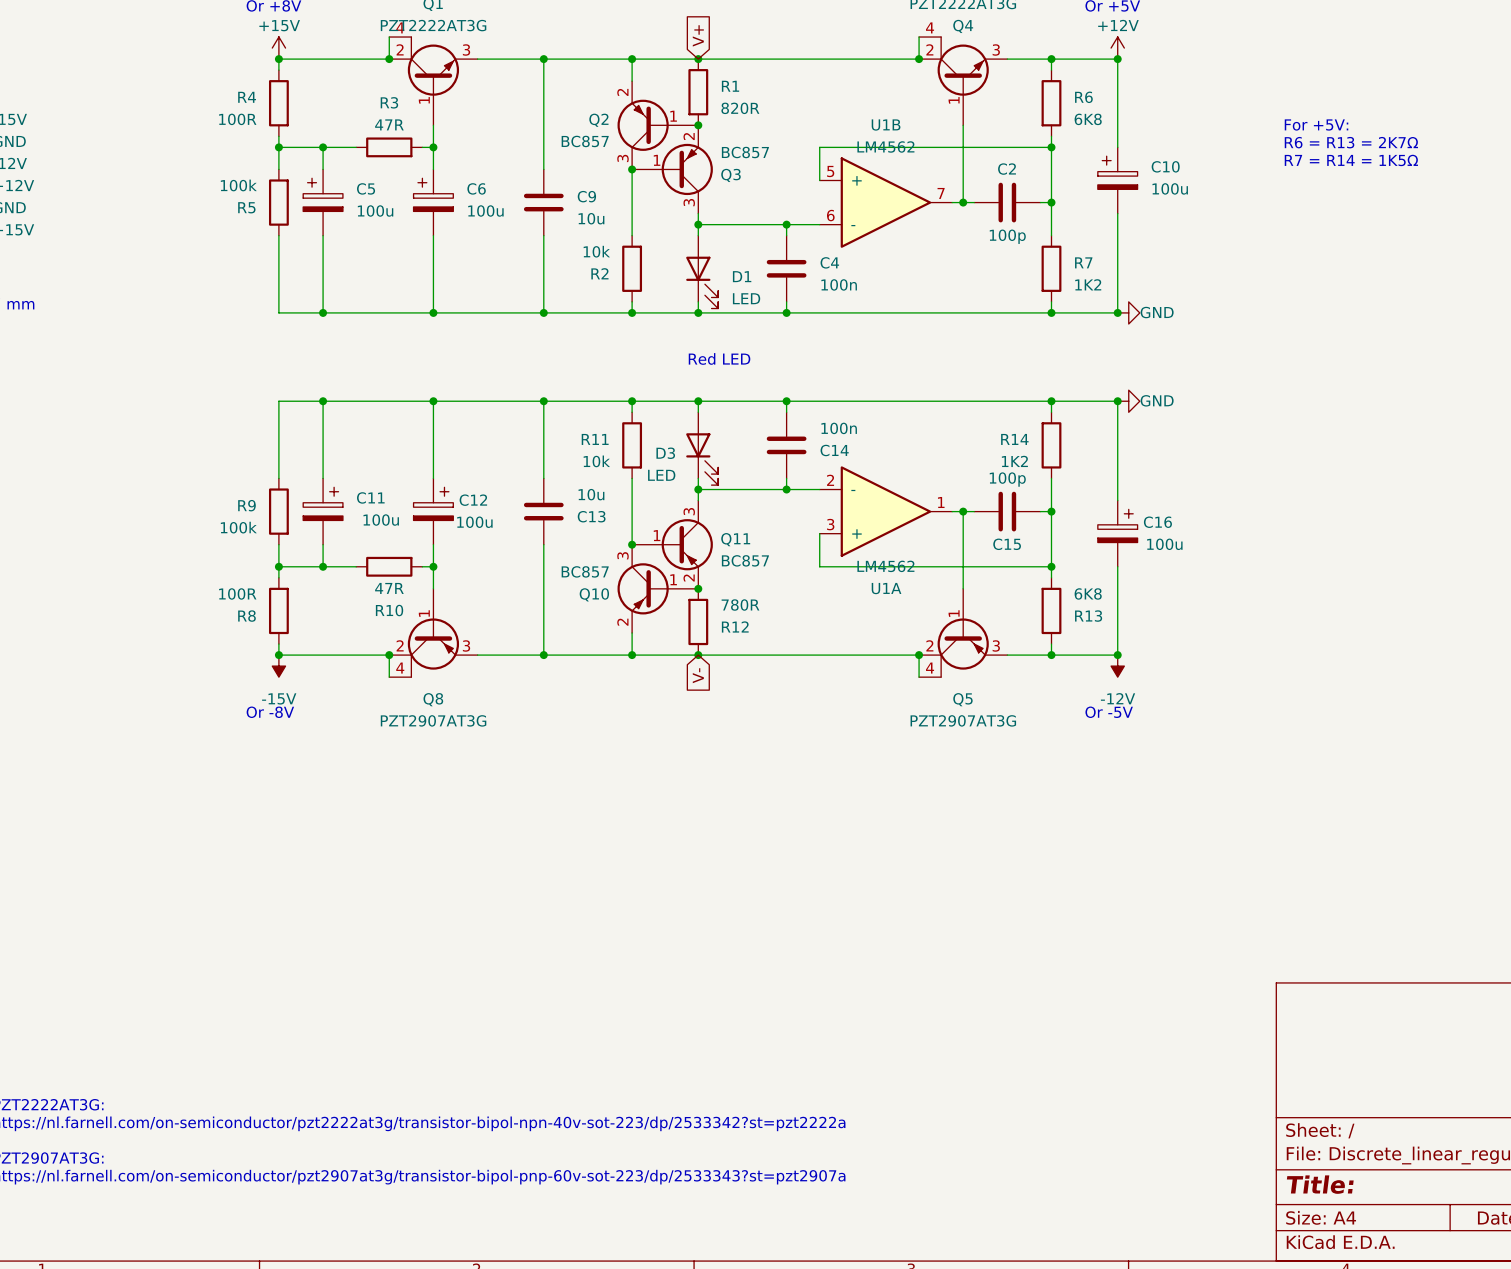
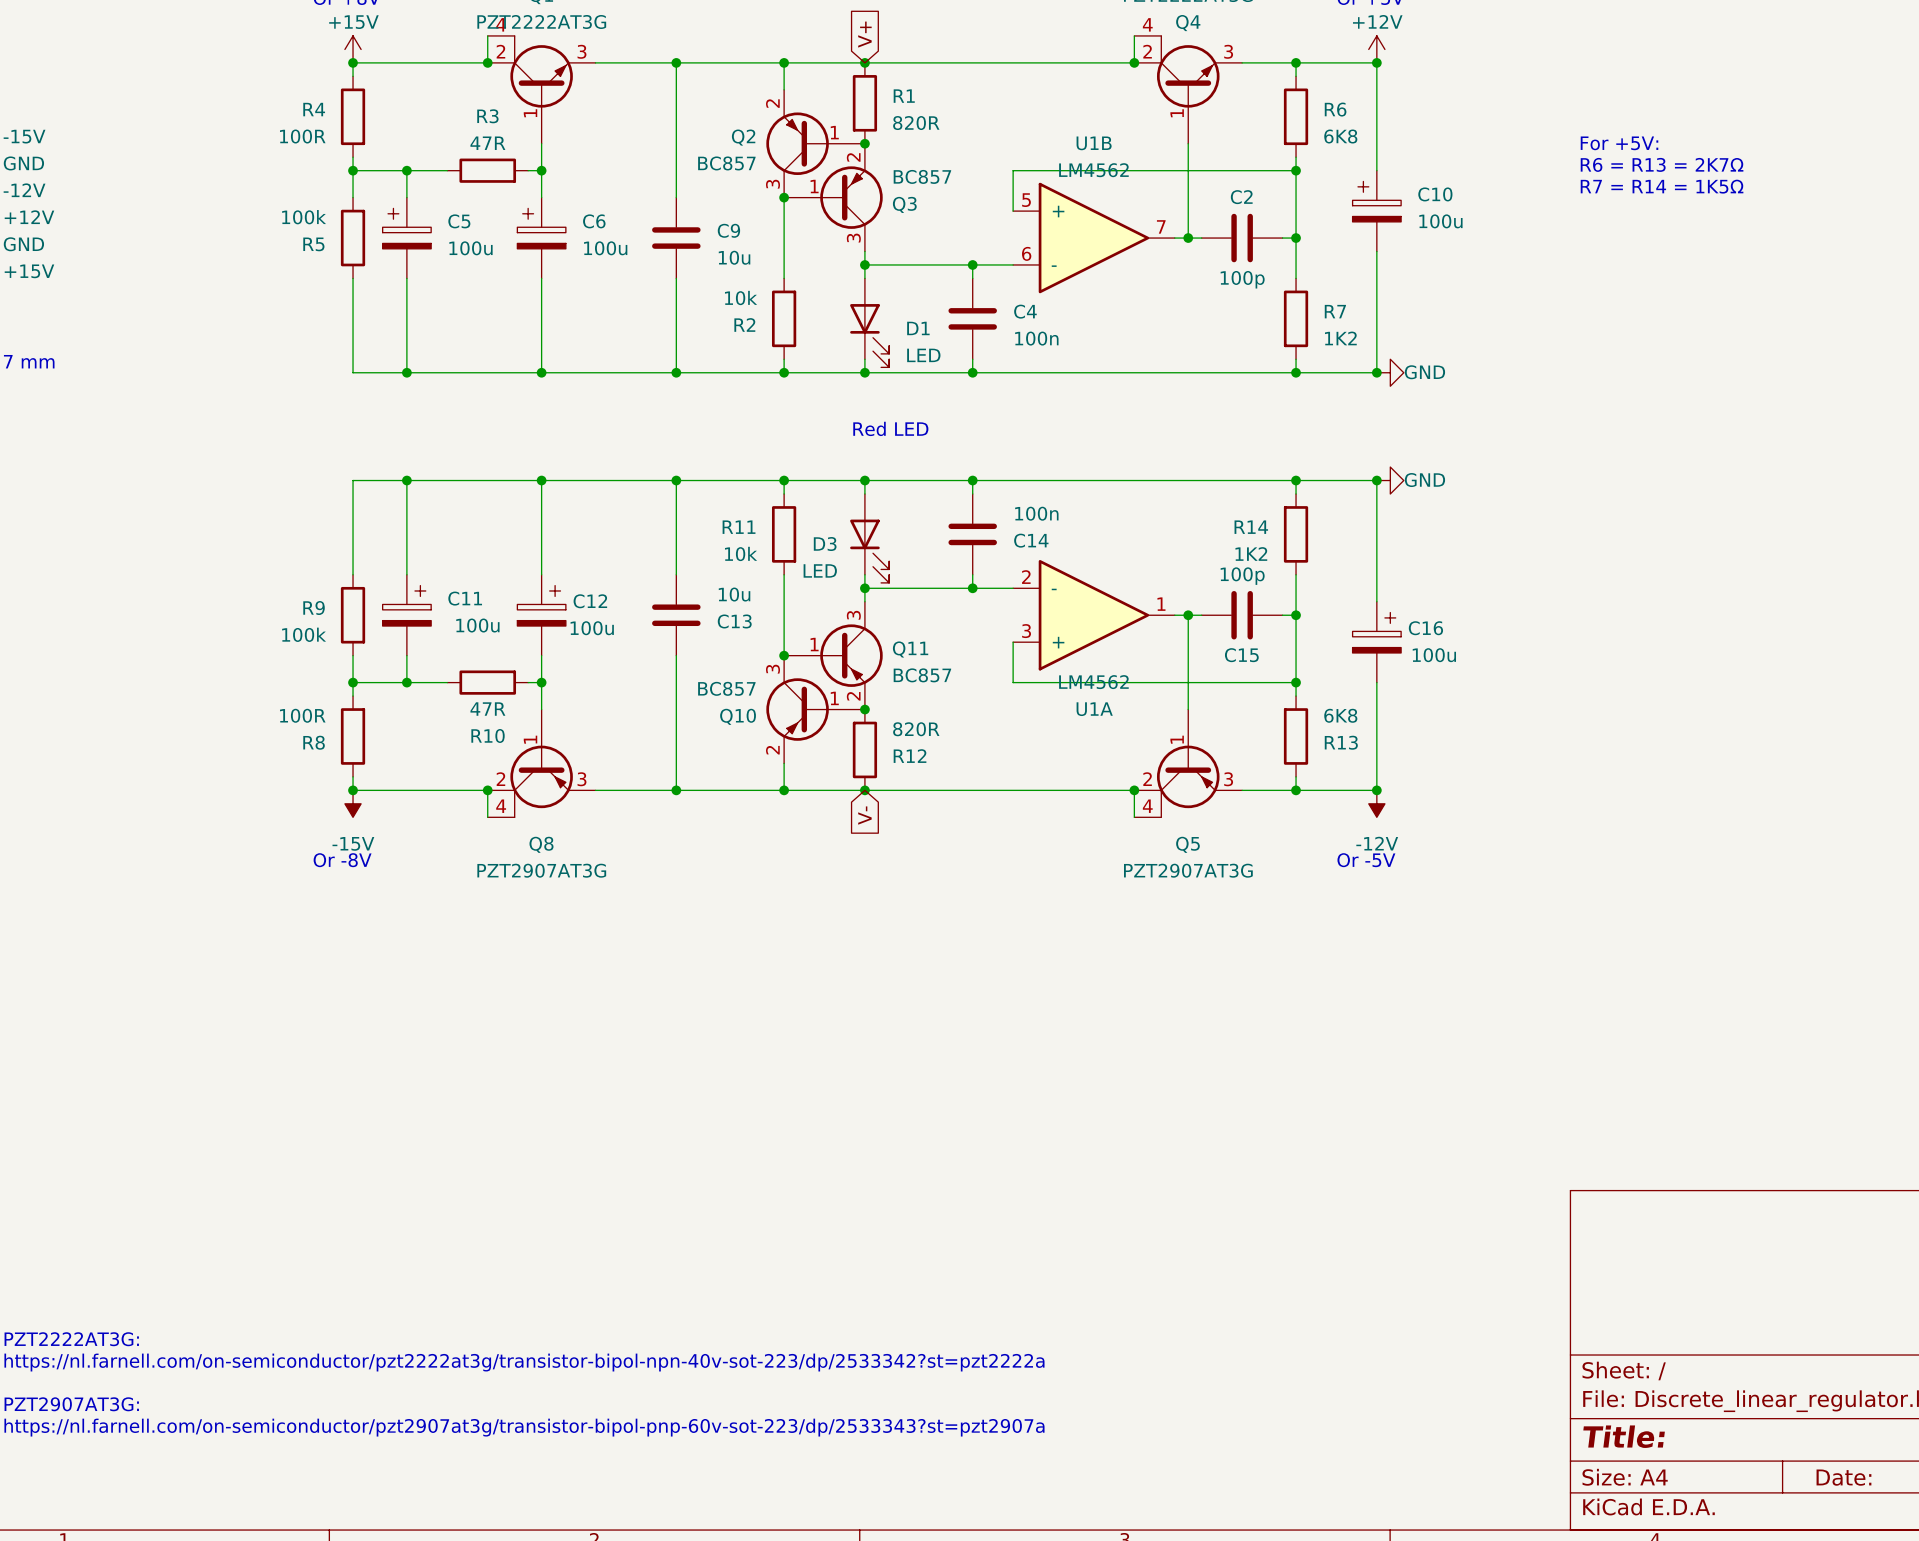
R12 value: 780R (740, 605) -> 820R (916, 729)

